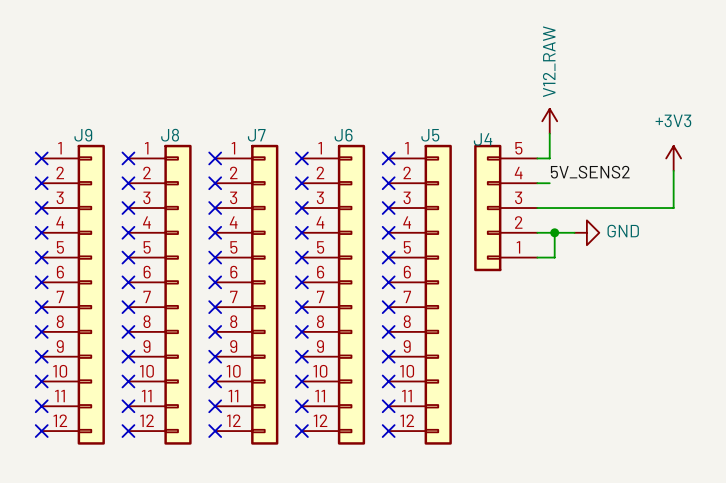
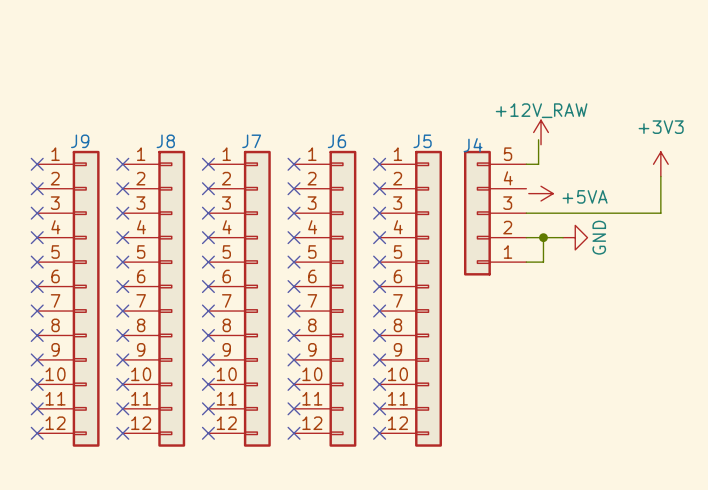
power symbol: V12_RAW (549, 121) -> +12V_RAW (541, 132)
label: 5V_SENS2 (590, 172) -> none
wire: (537, 183) (549, 183) -> none
power symbol: none -> +5VA (541, 193)
power symbol text rotation: 0° (623, 231) -> 90° counterclockwise (599, 237)

